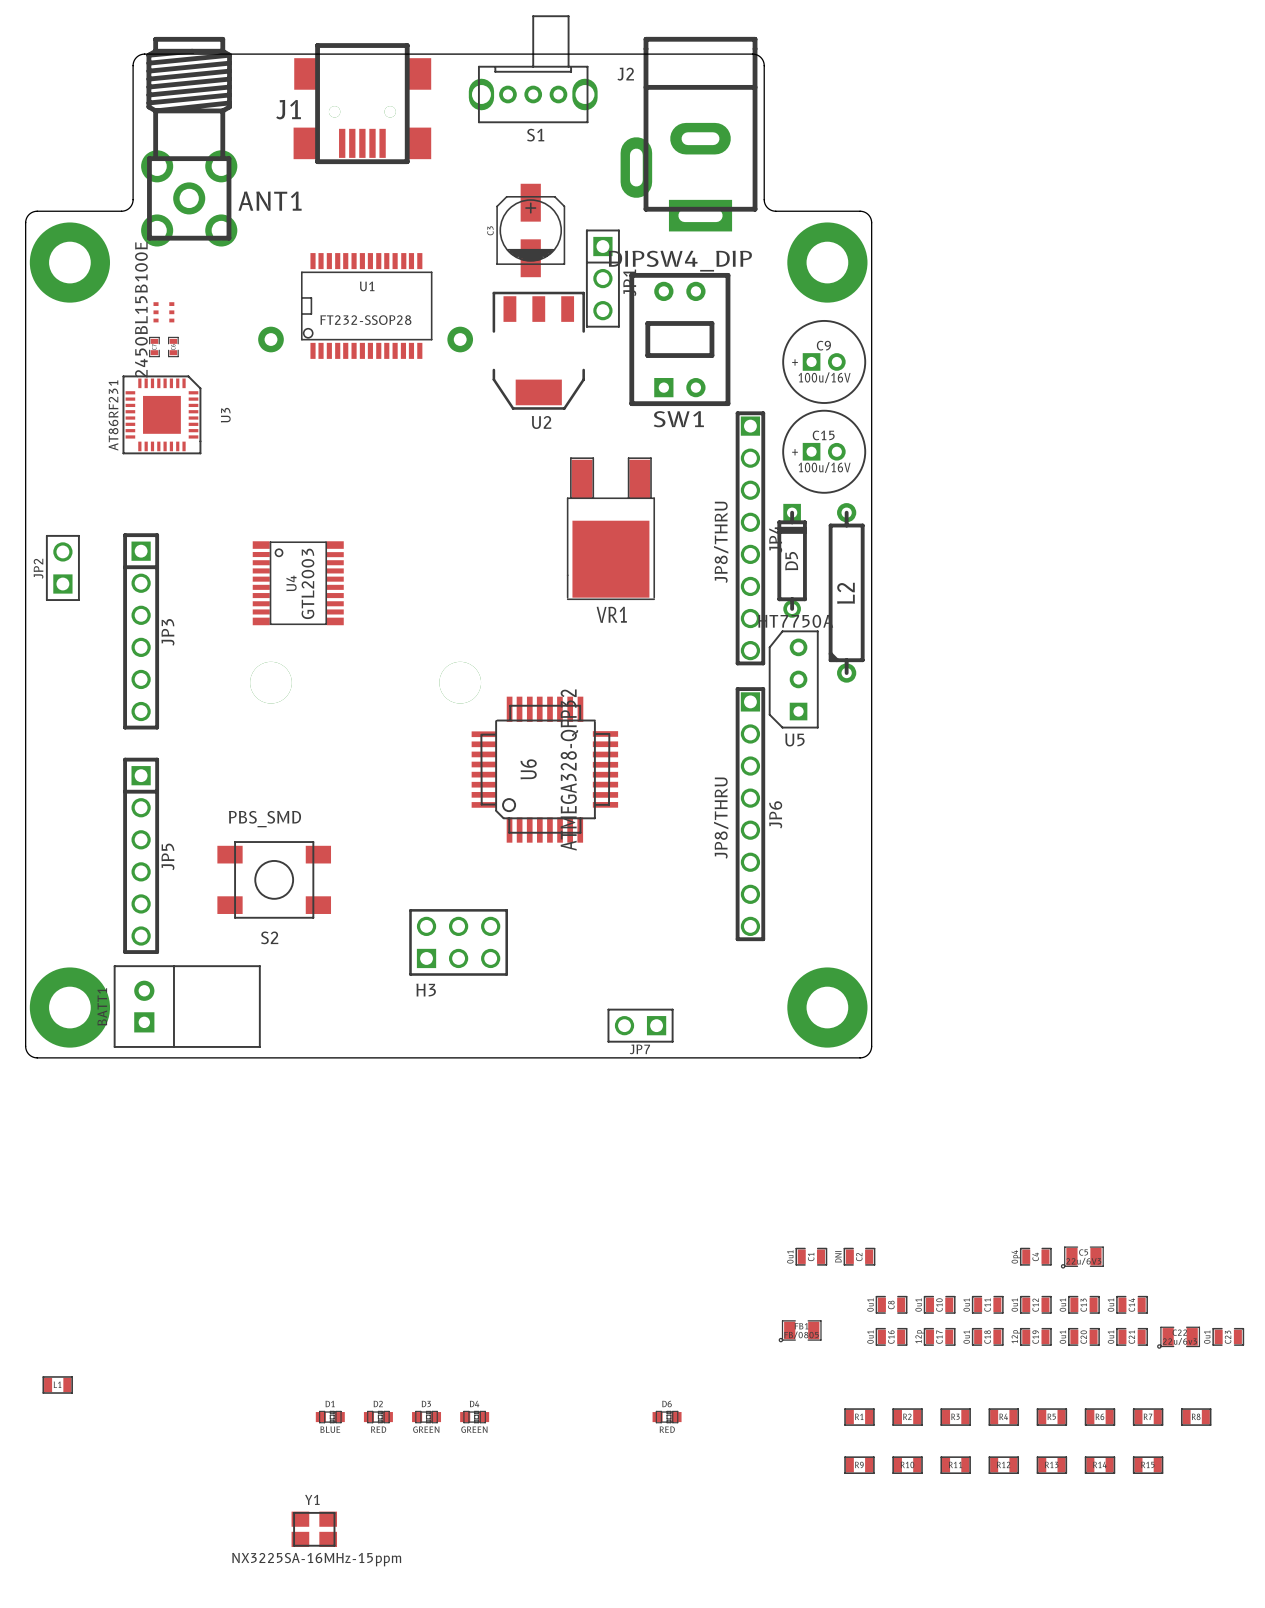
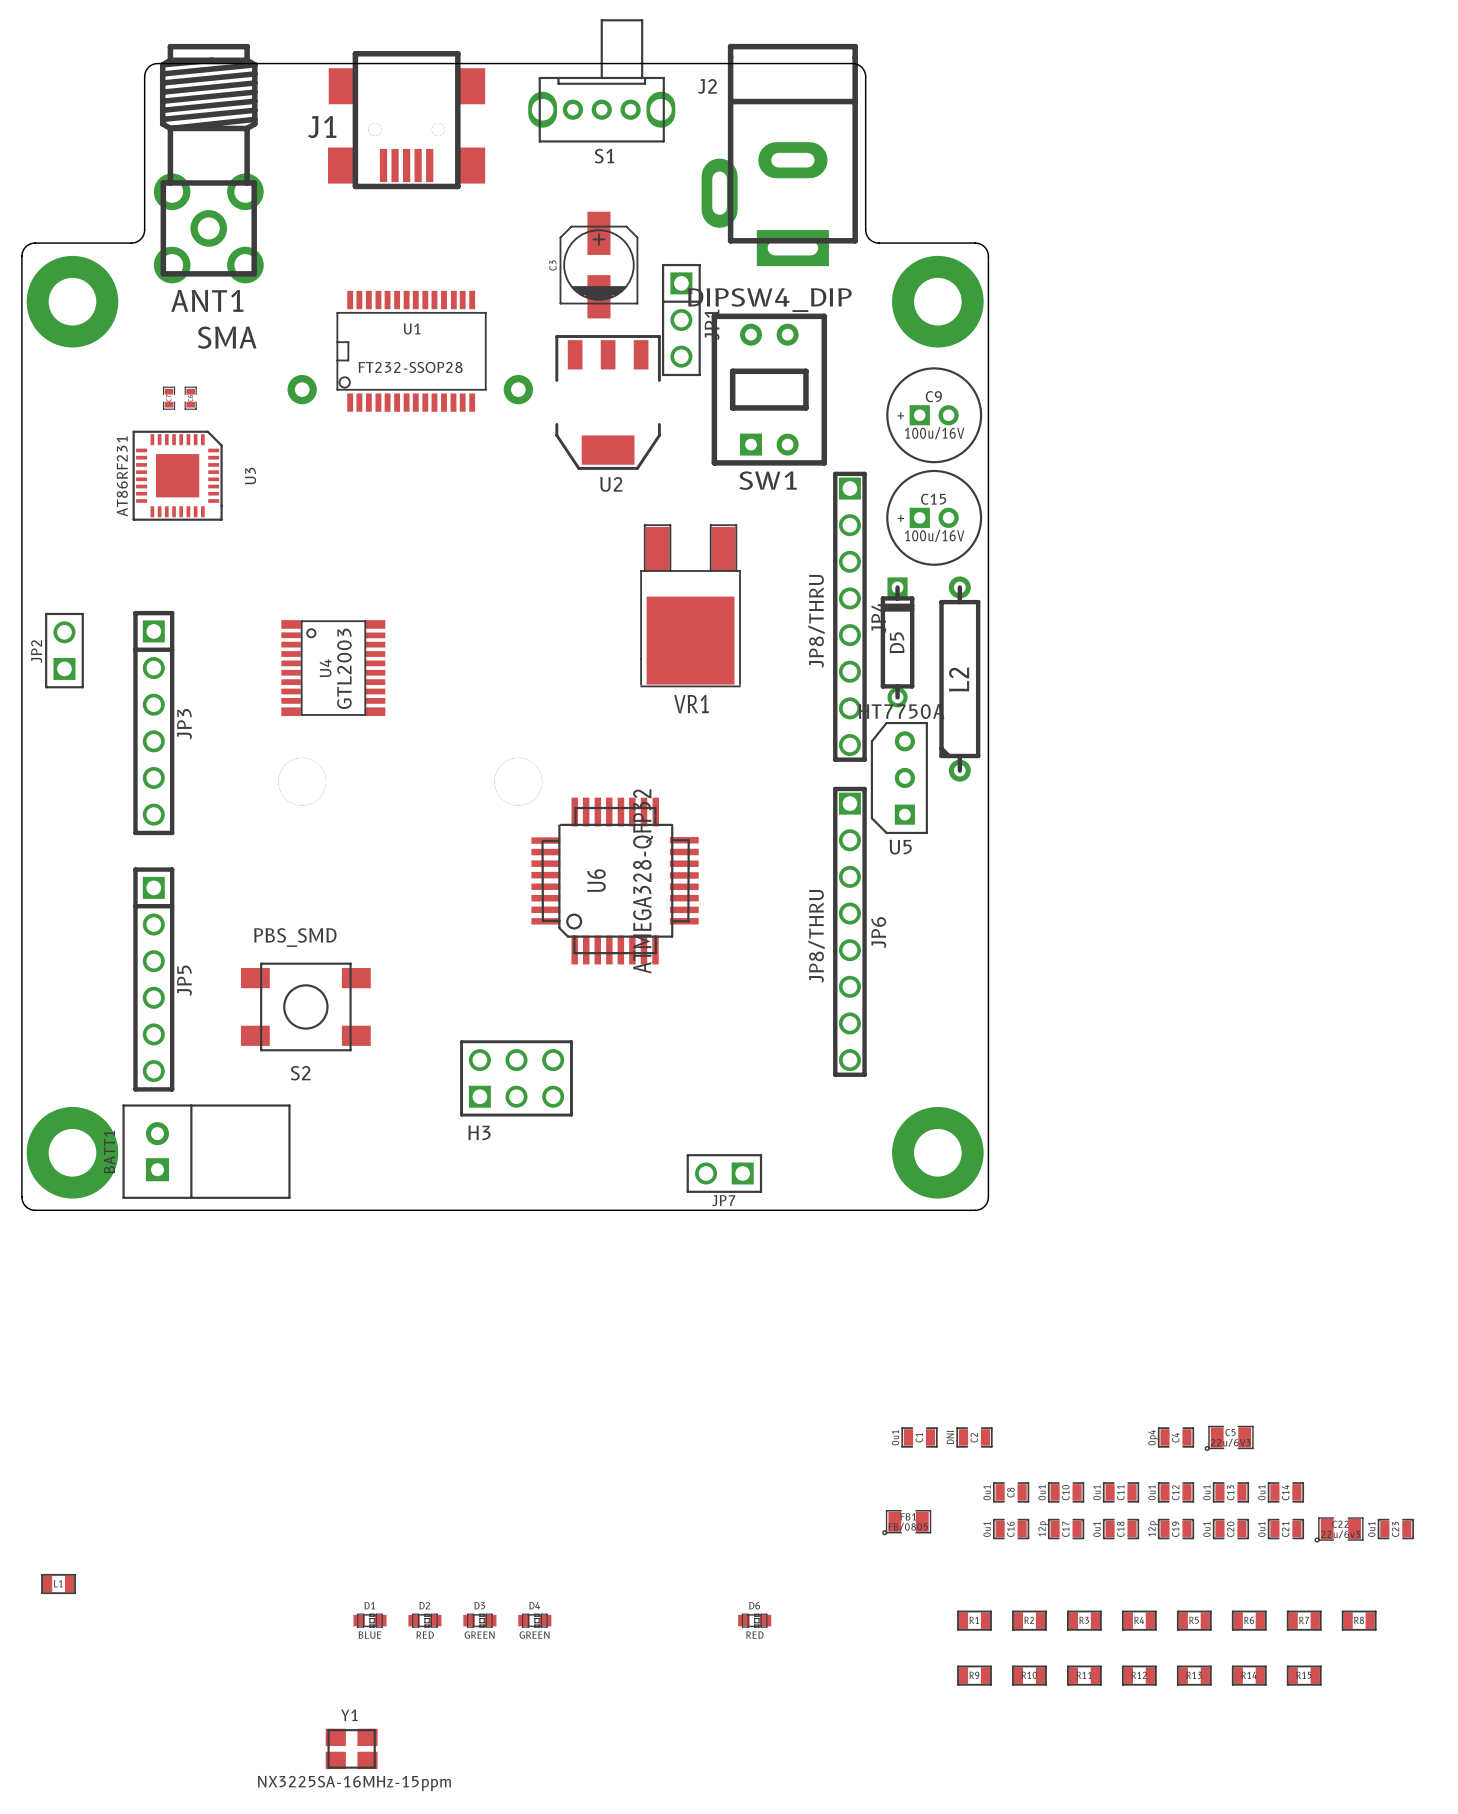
ANT1 name position: ANT1 (270, 201) -> ANT1 (207, 300)
ANT1 value: none -> SMA (227, 337)
part: 2450BL15B100E (163, 312) -> none

